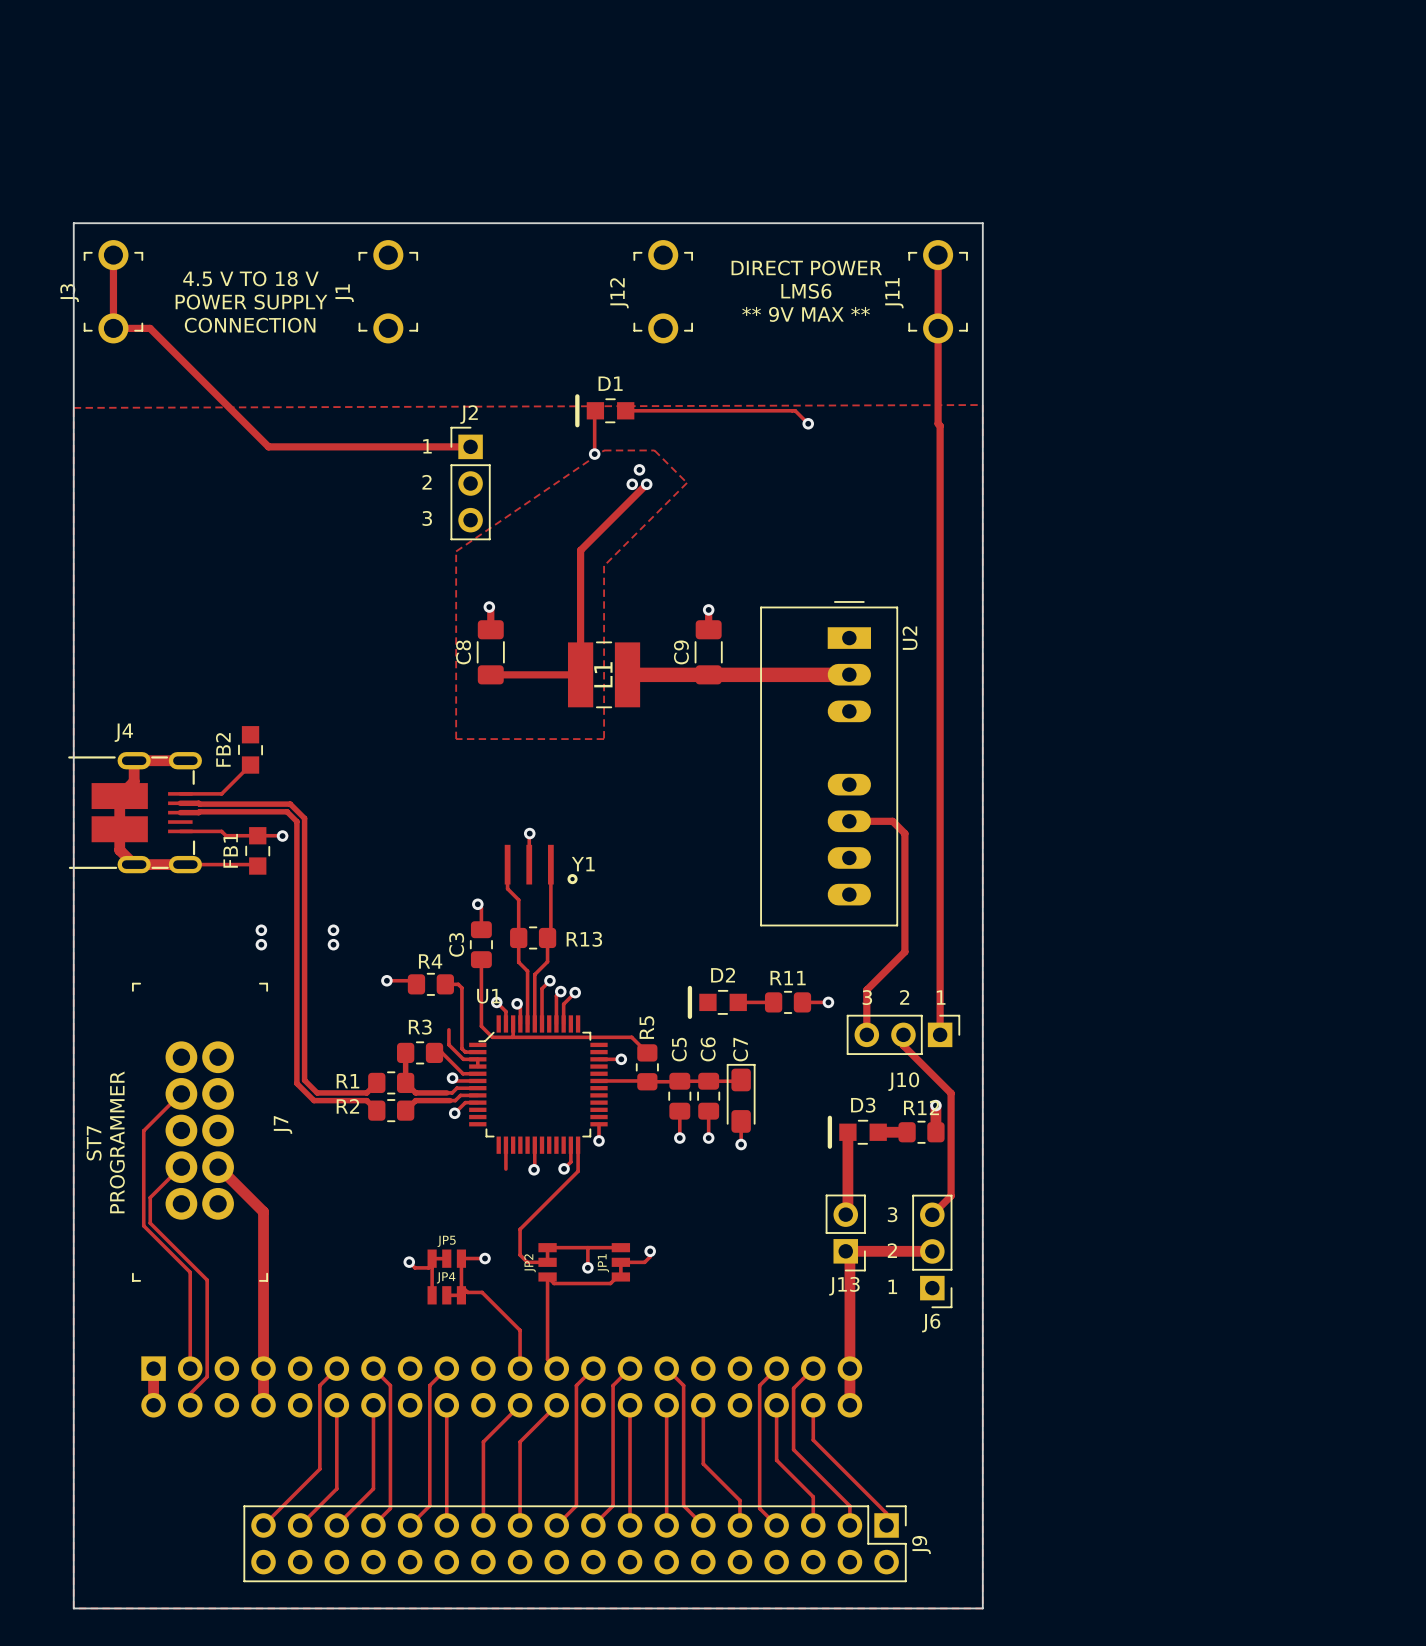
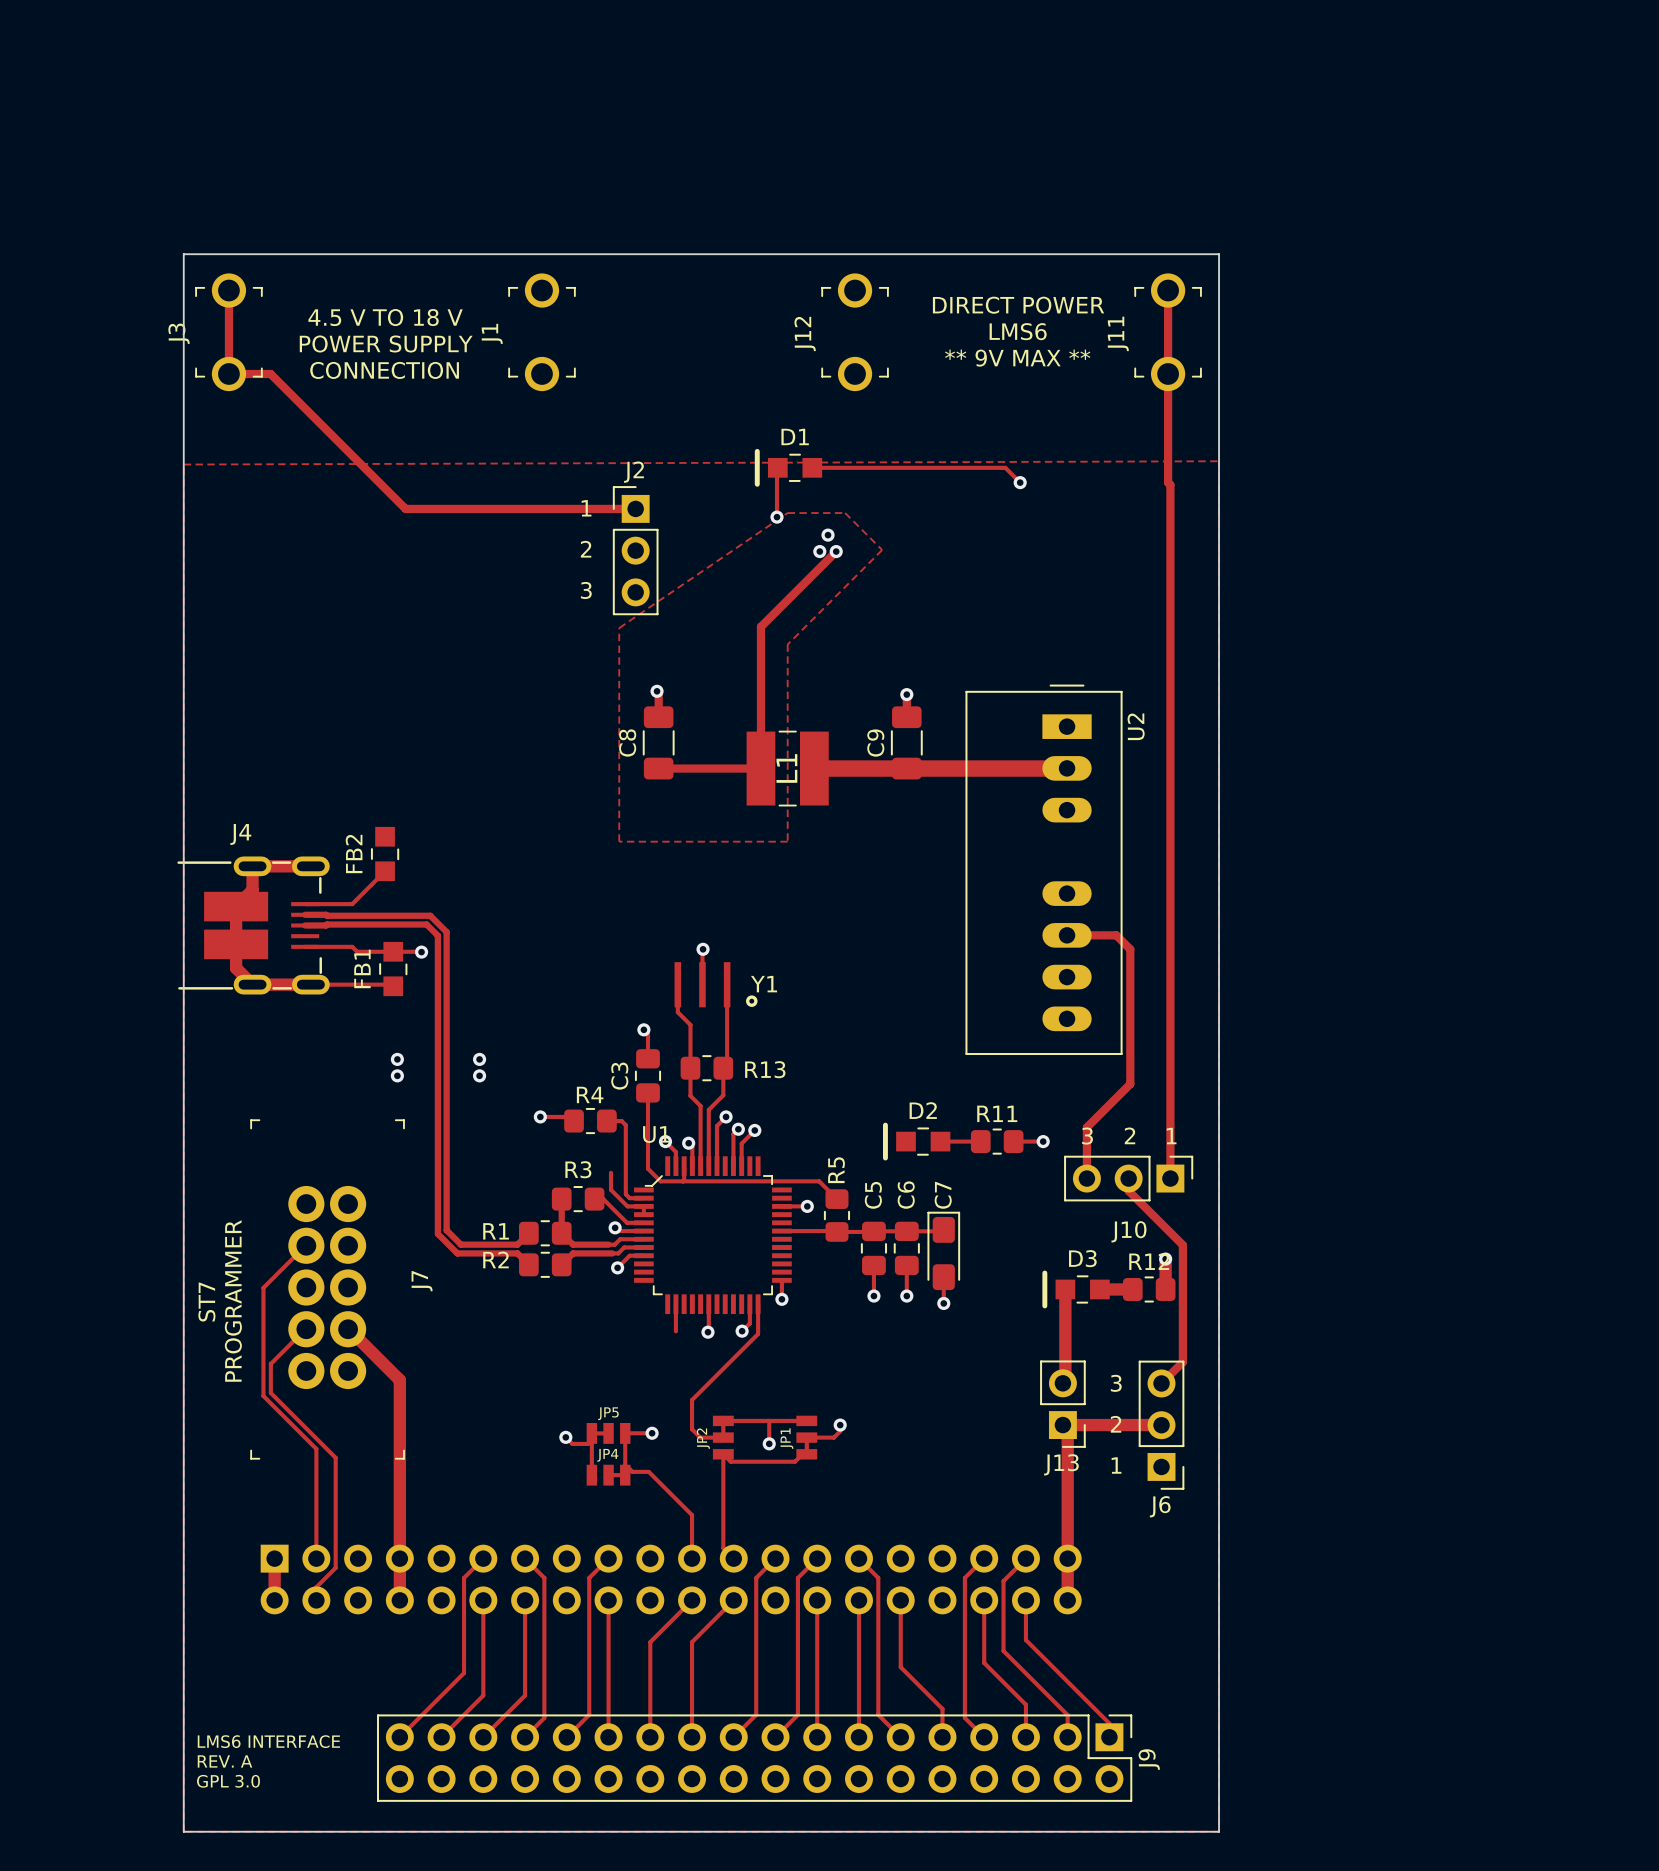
text: none -> LMS6 INTERFACE (268, 1741)
text: none -> REV. A (225, 1761)
text: none -> GPL 3.0 (228, 1781)

